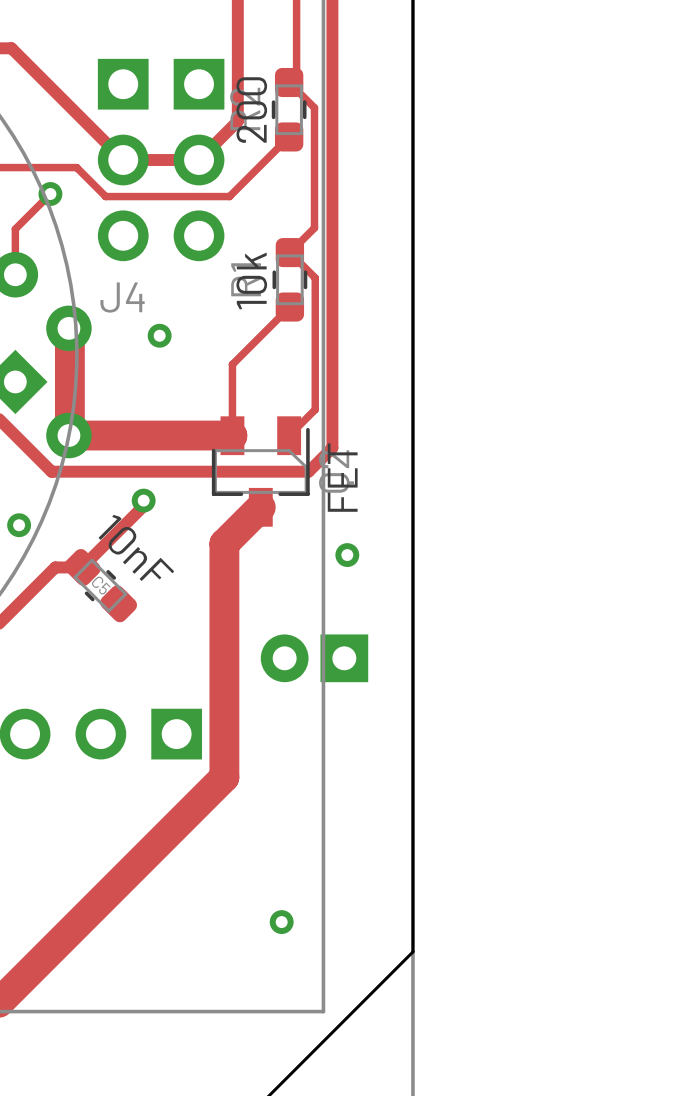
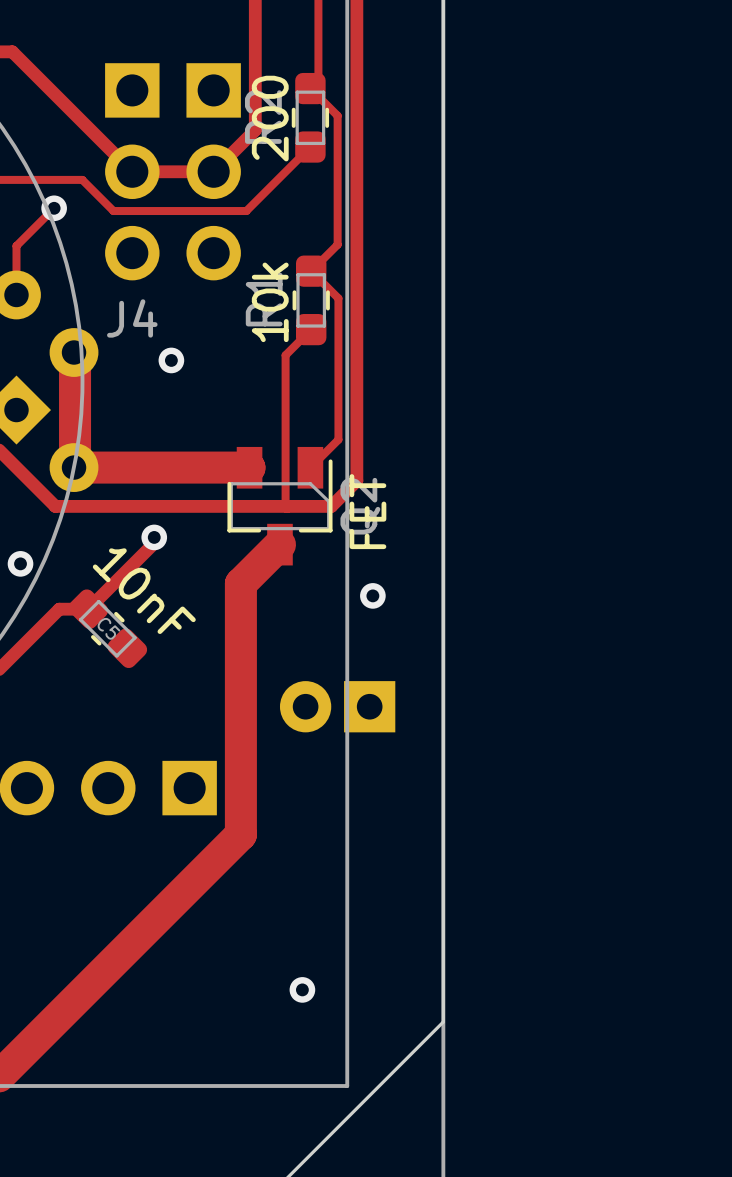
track: (266, 330) (232, 364) (232, 435) -> (285, 355) (287, 506)

